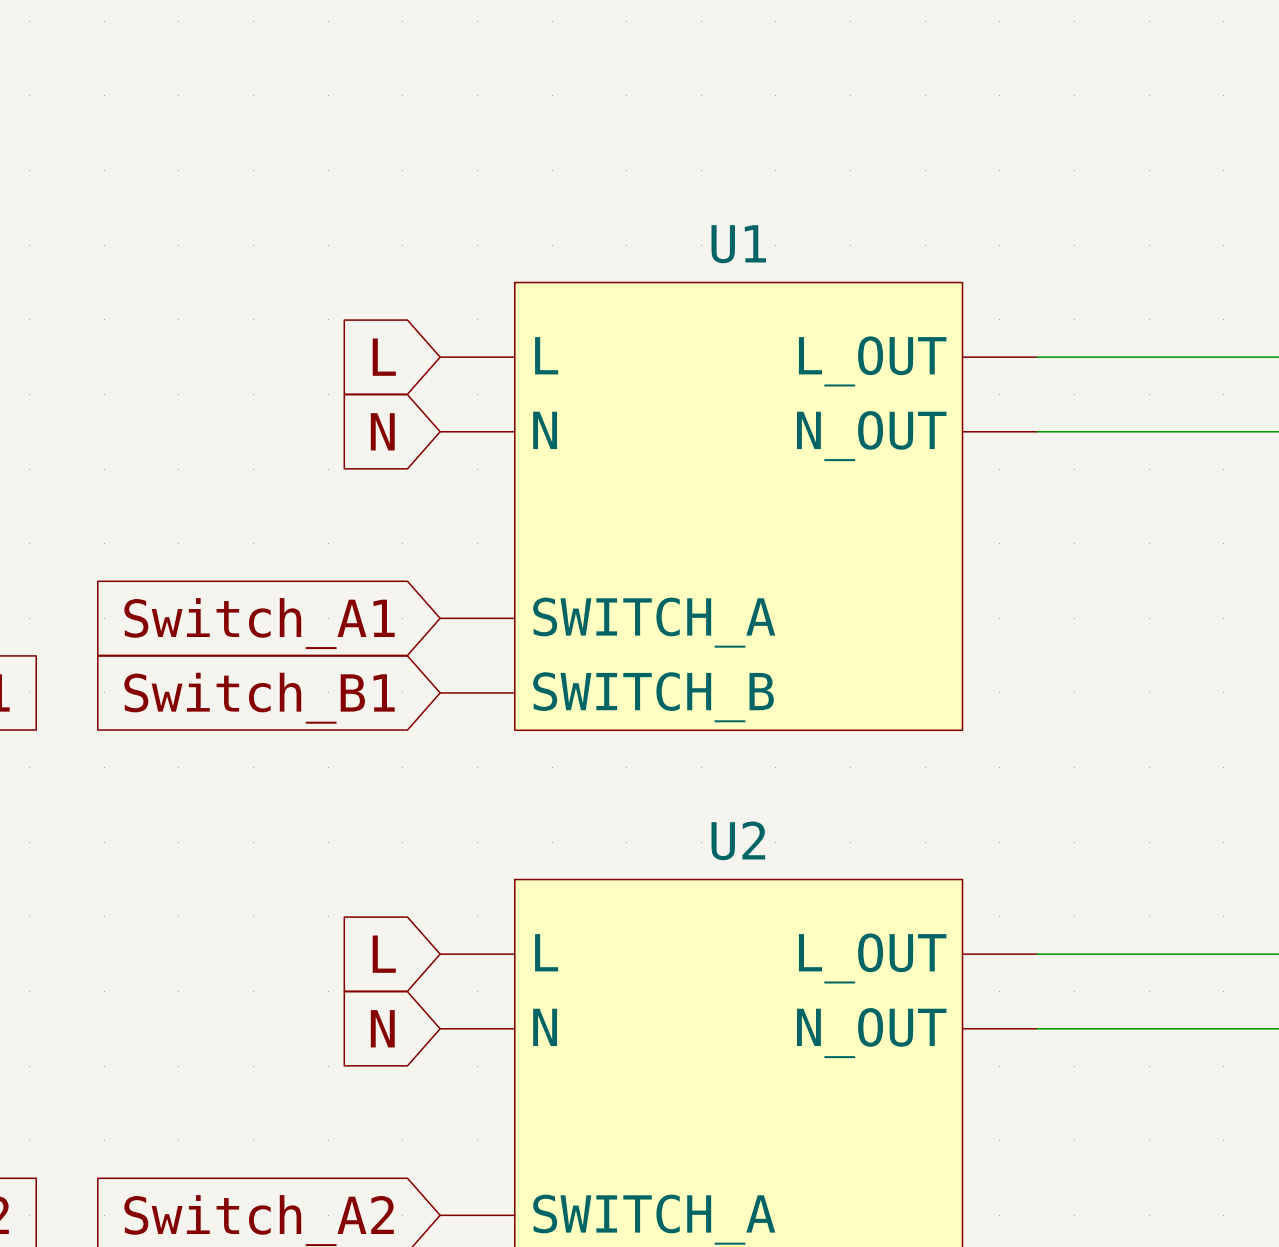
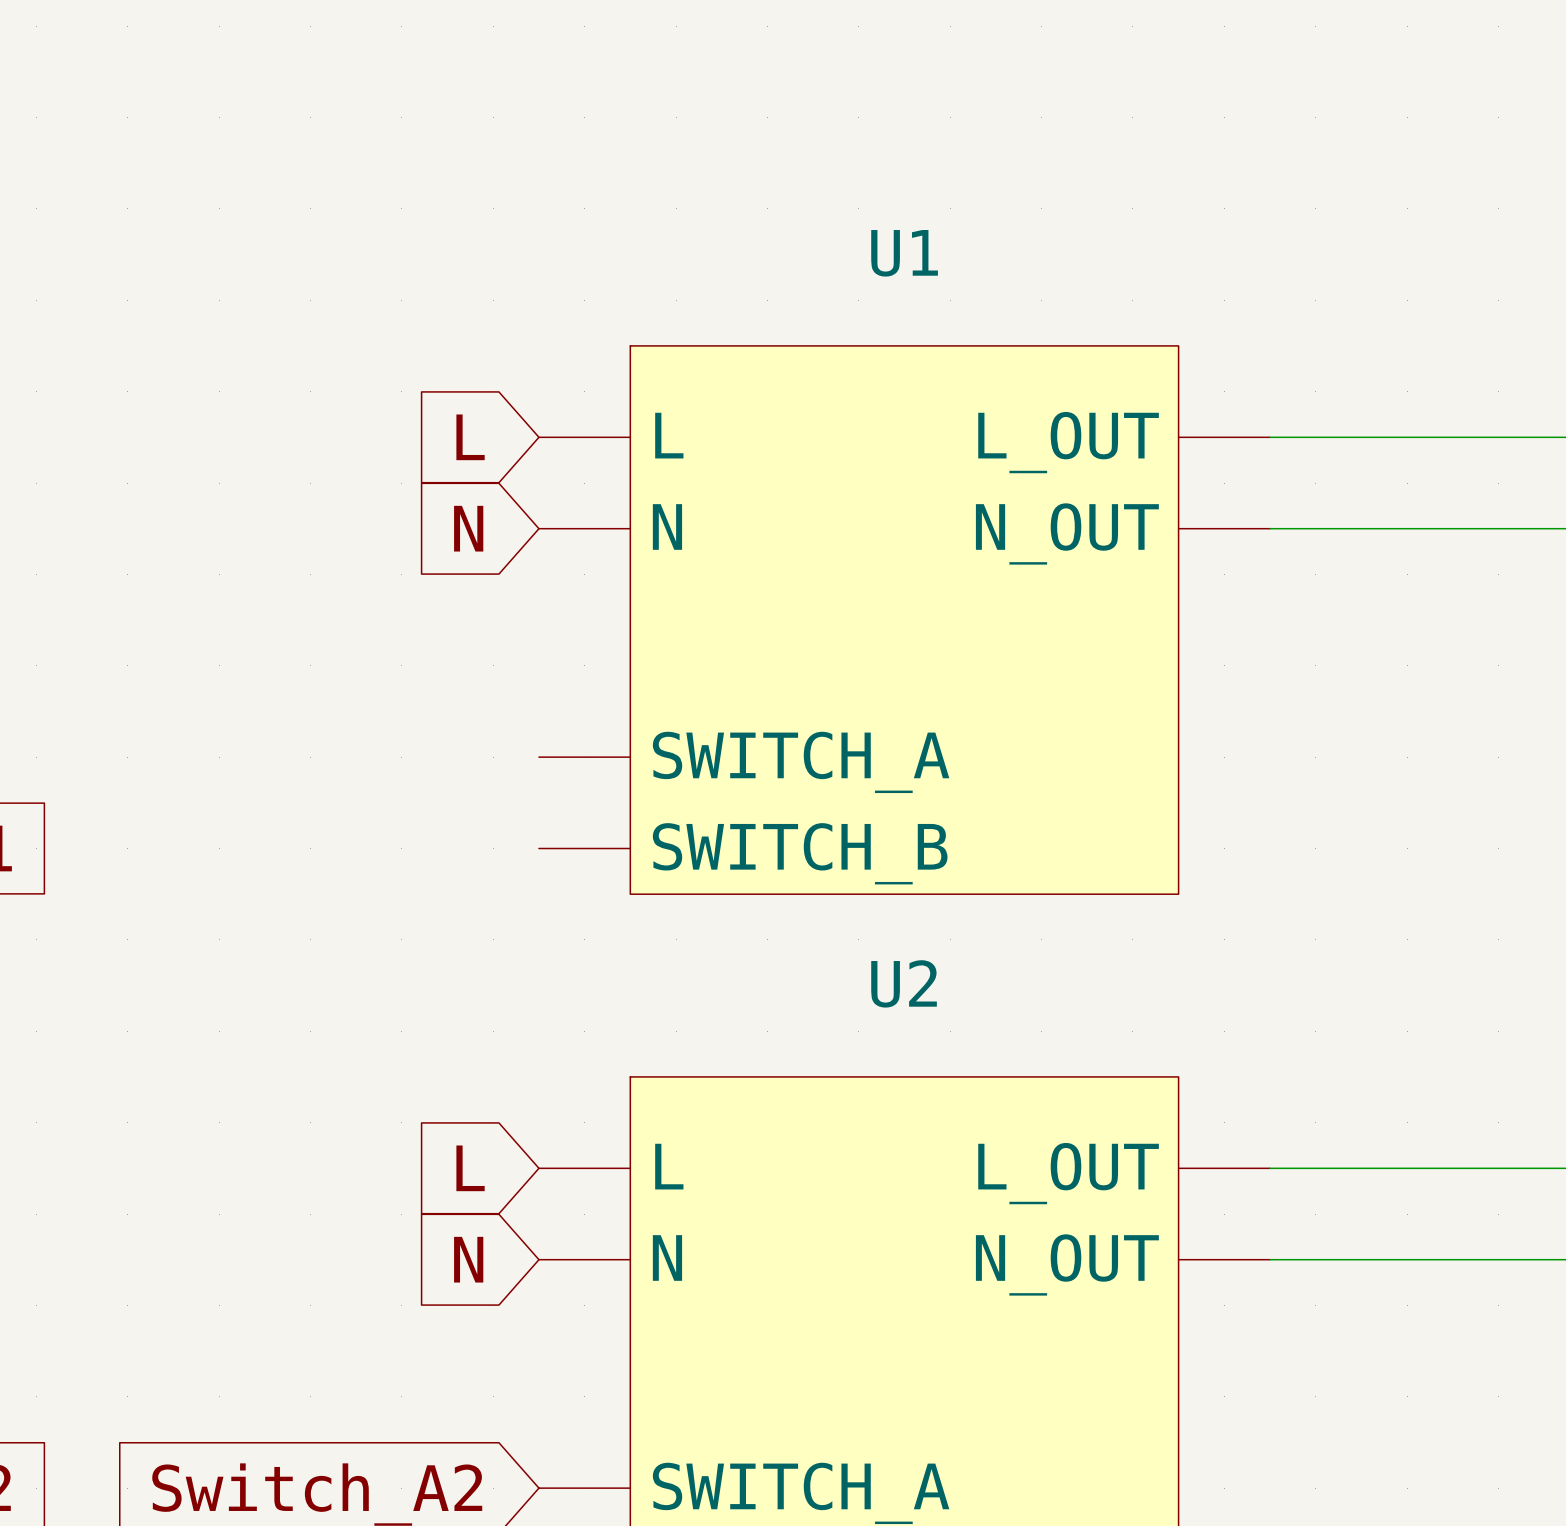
U1 name position: U1 (738, 244) -> U1 (904, 253)
global label: Switch_A1 (259, 623) -> none
global label: Switch_B1 (259, 698) -> none
U2 name position: U2 (738, 840) -> U2 (904, 983)

